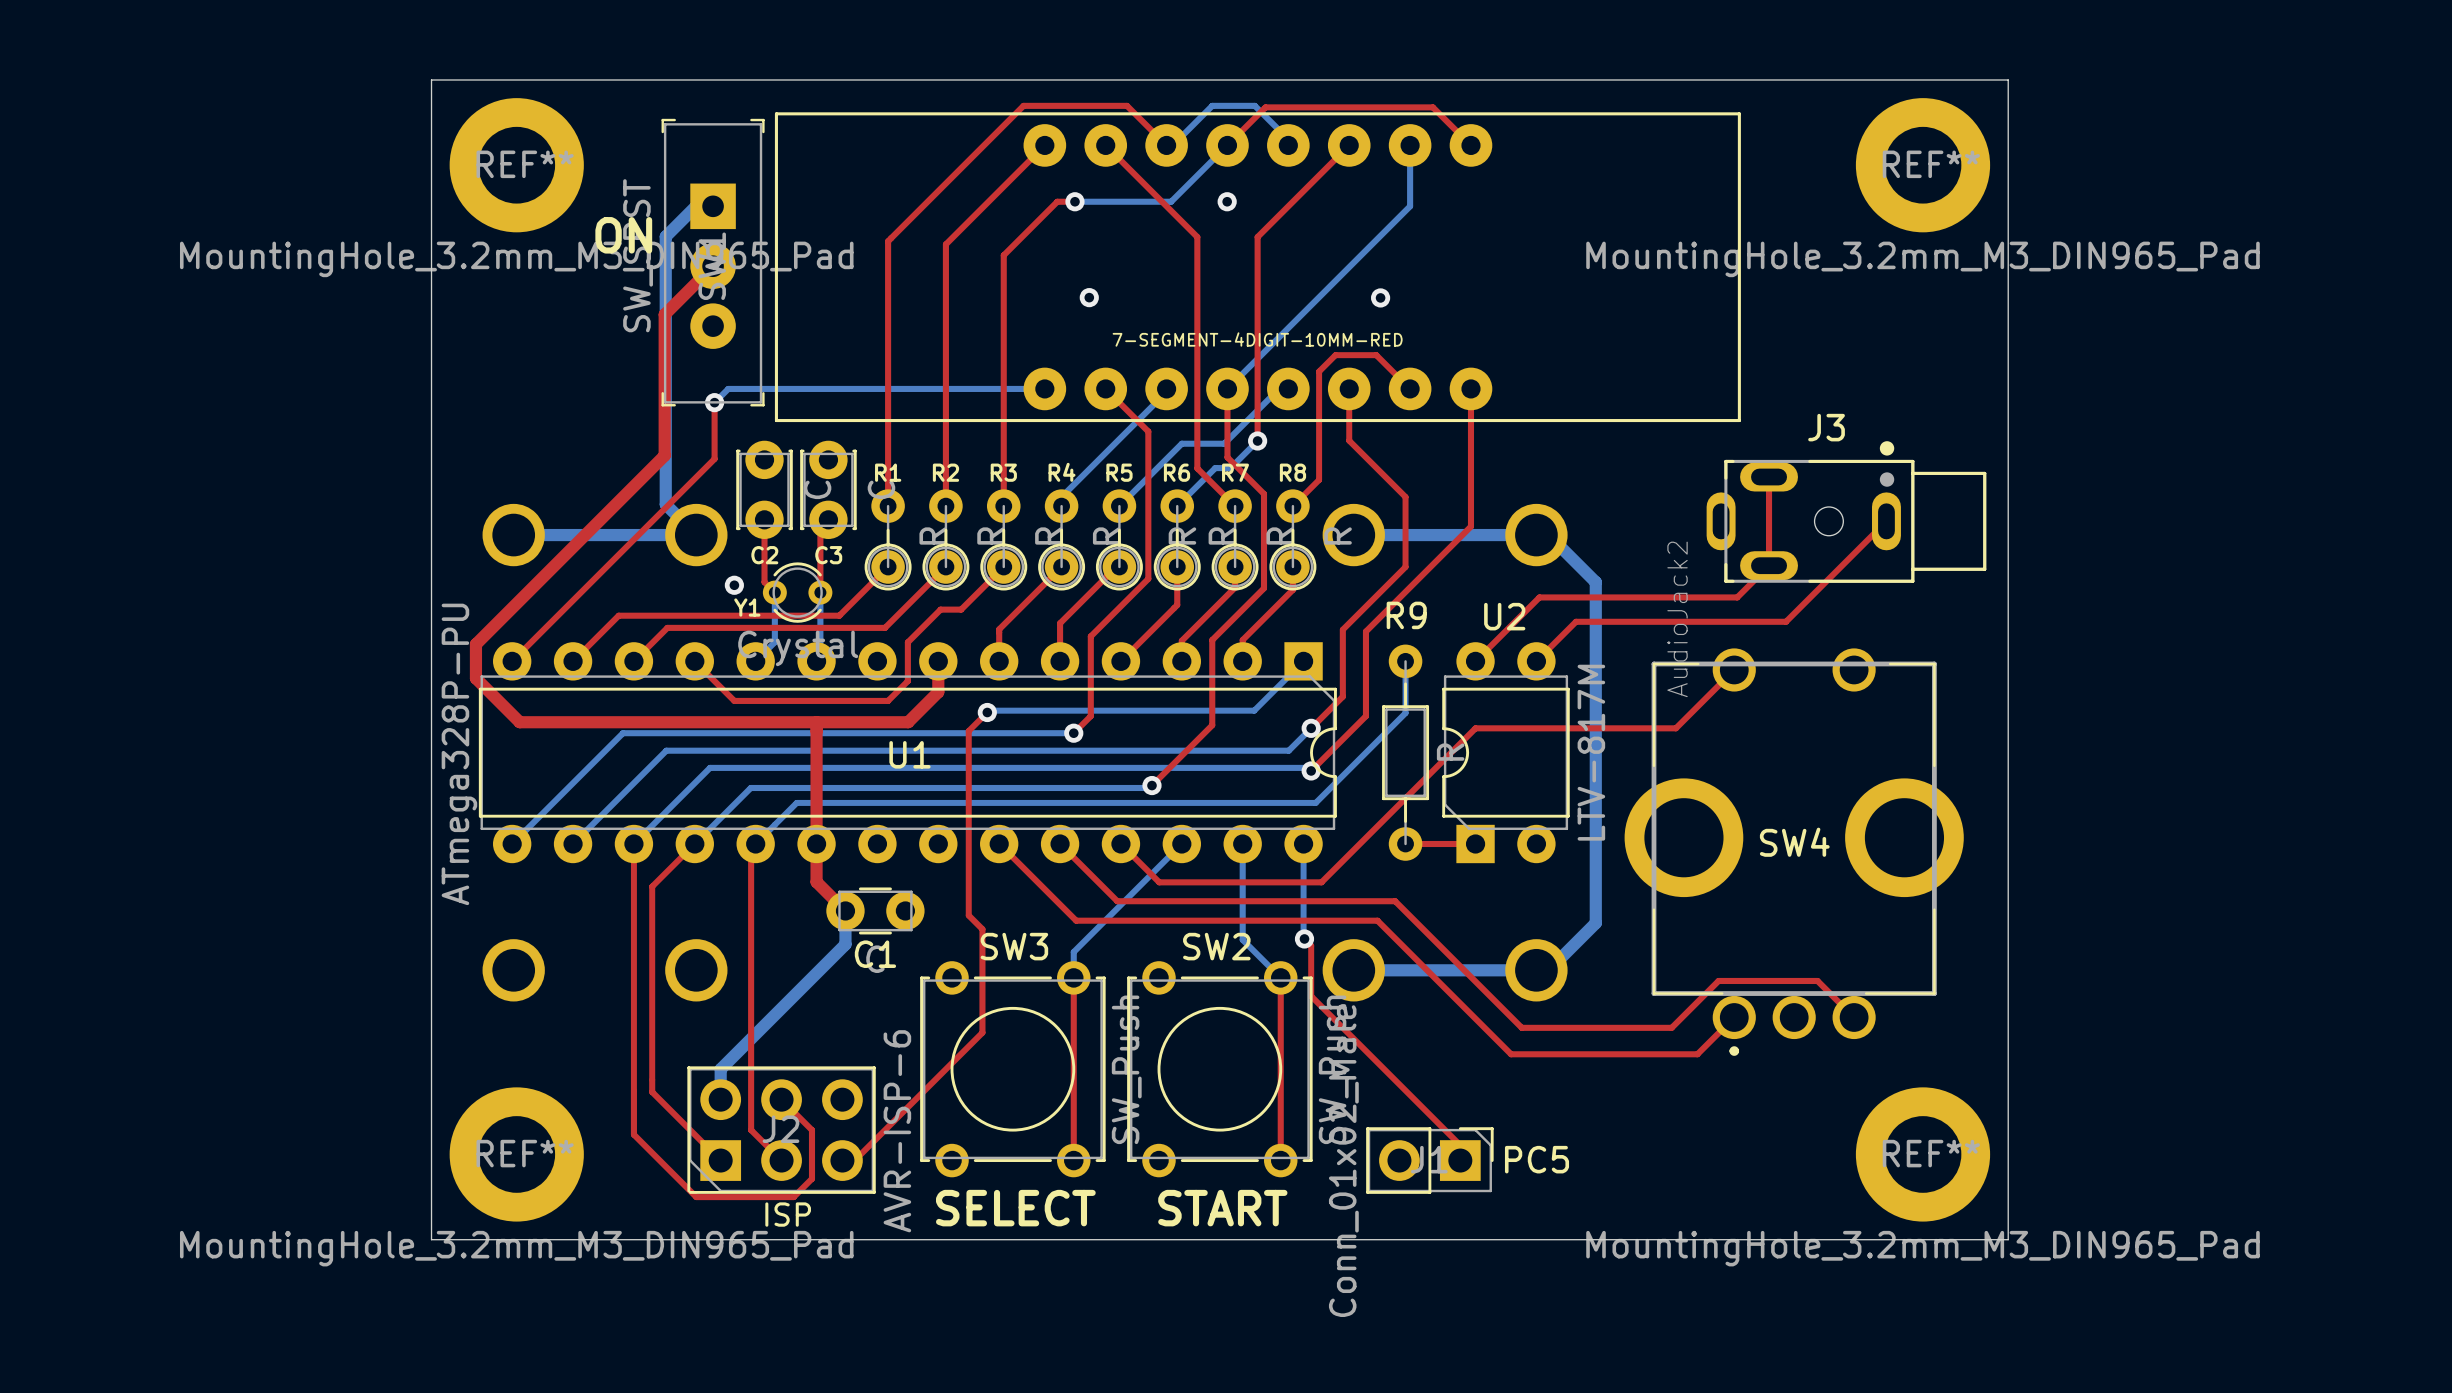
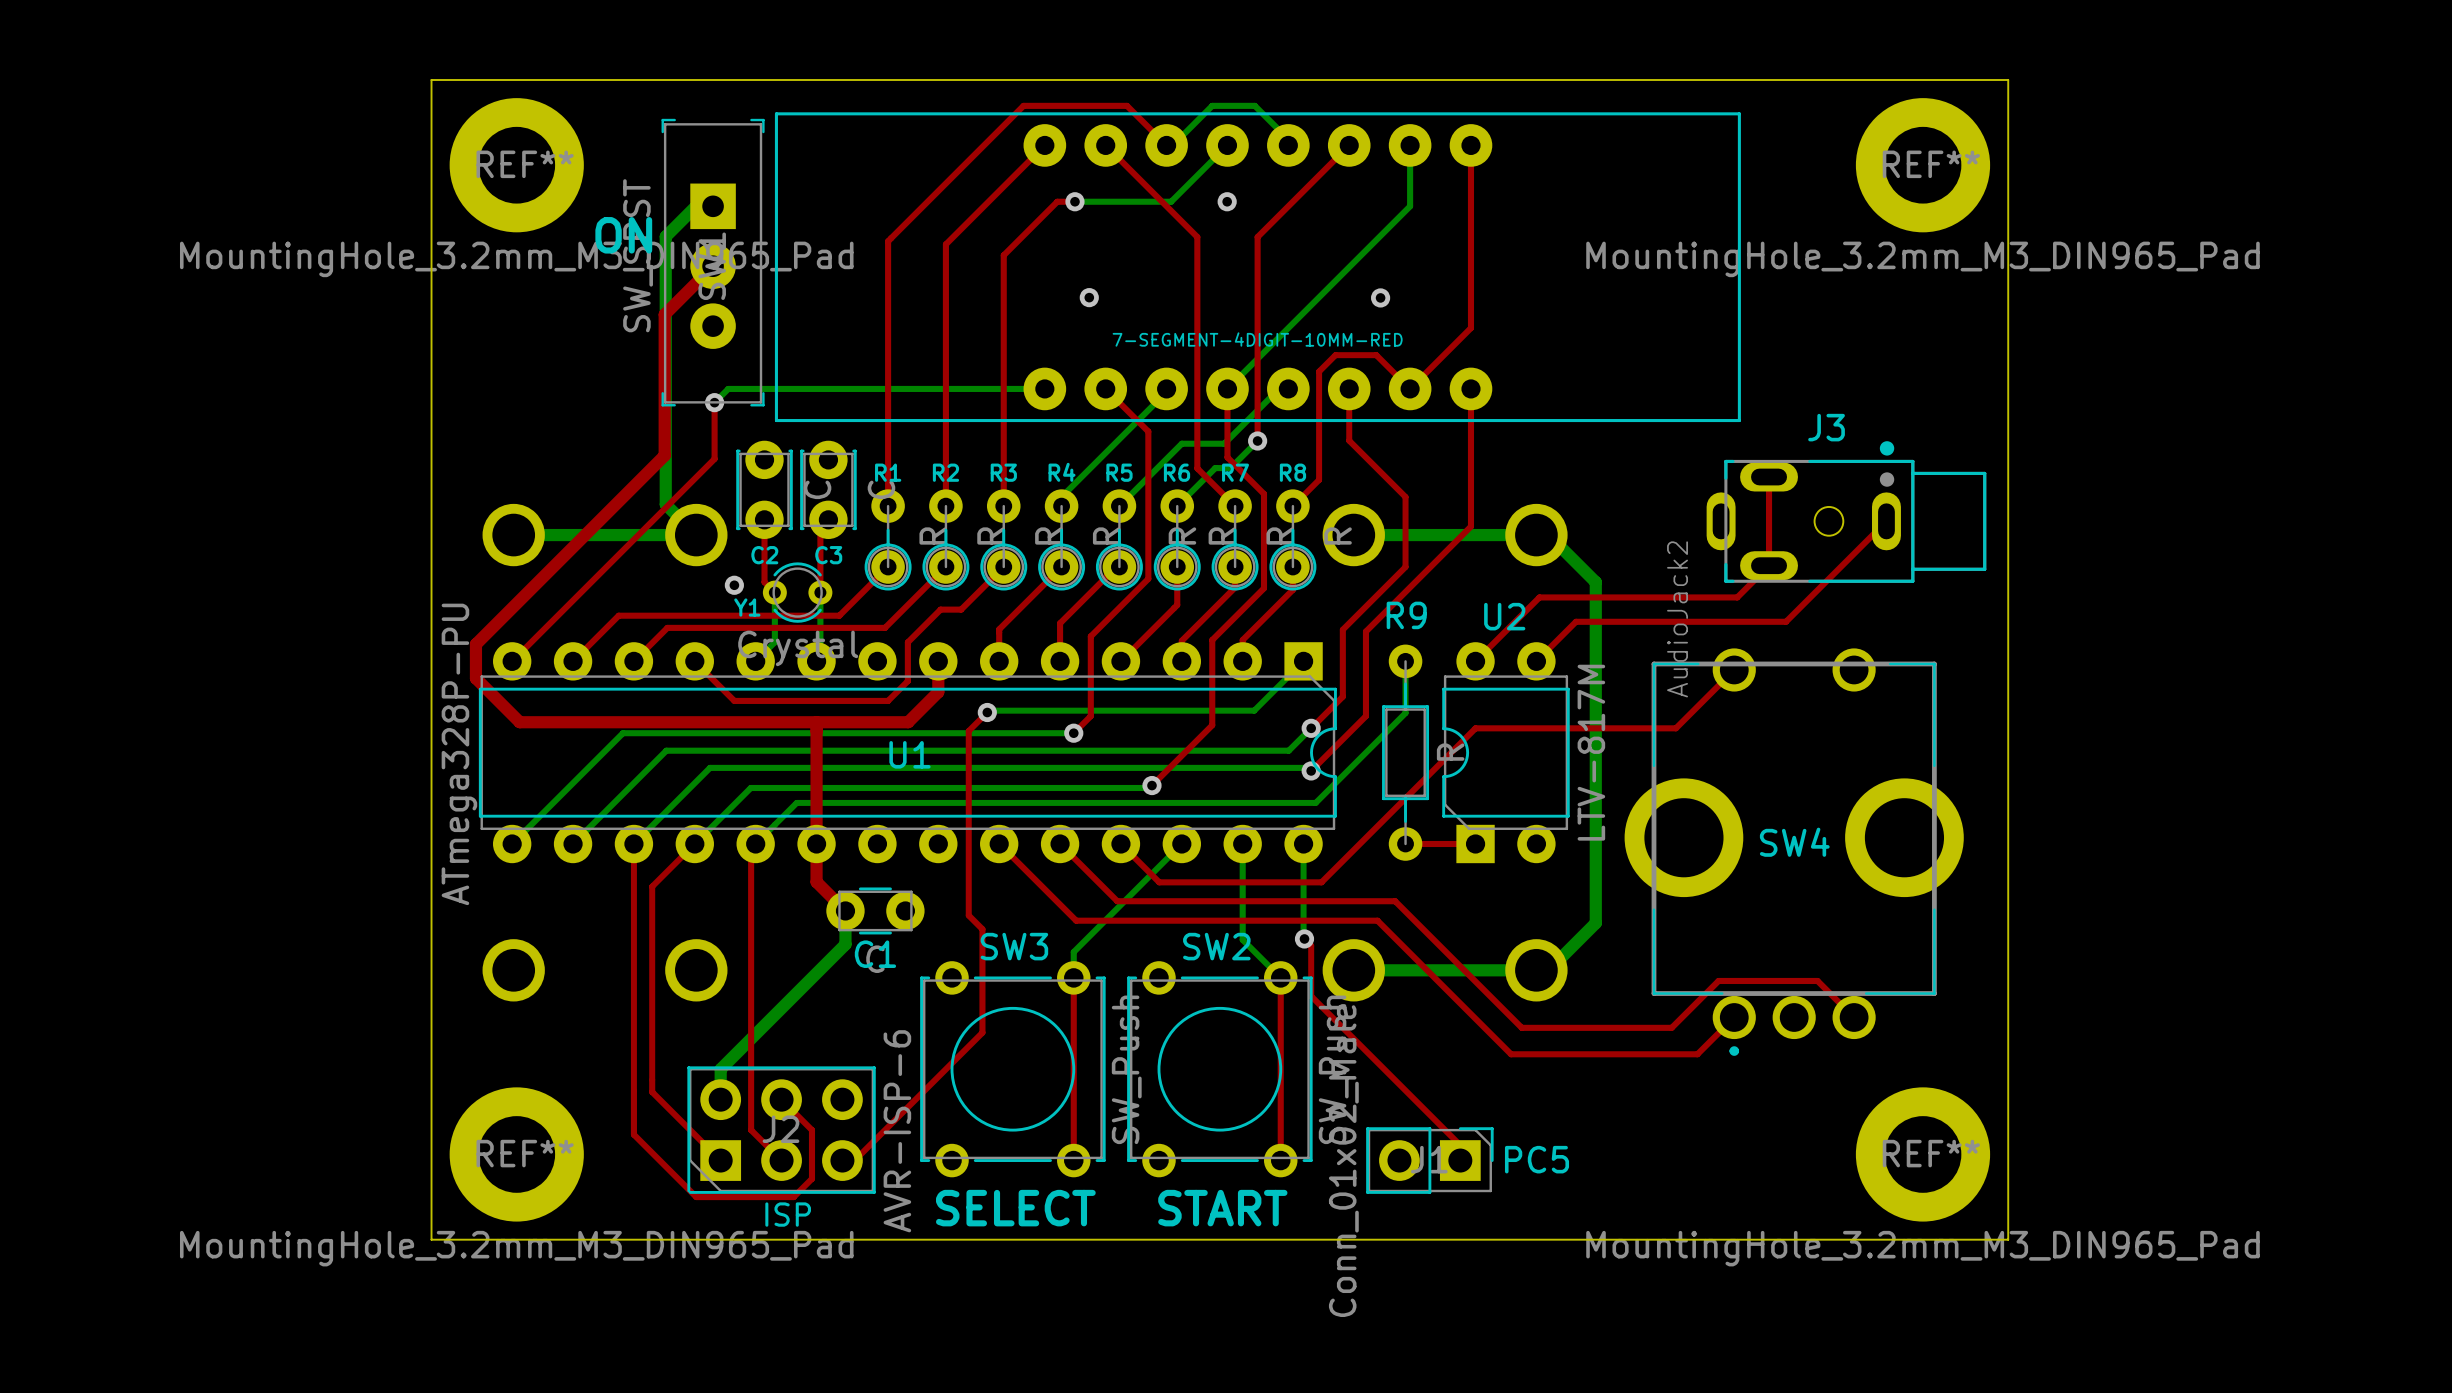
top track: (1227, 145) (1265, 107) (1432, 107) (1470, 145) -> (1410, 388) (1470, 328) (1470, 145)

